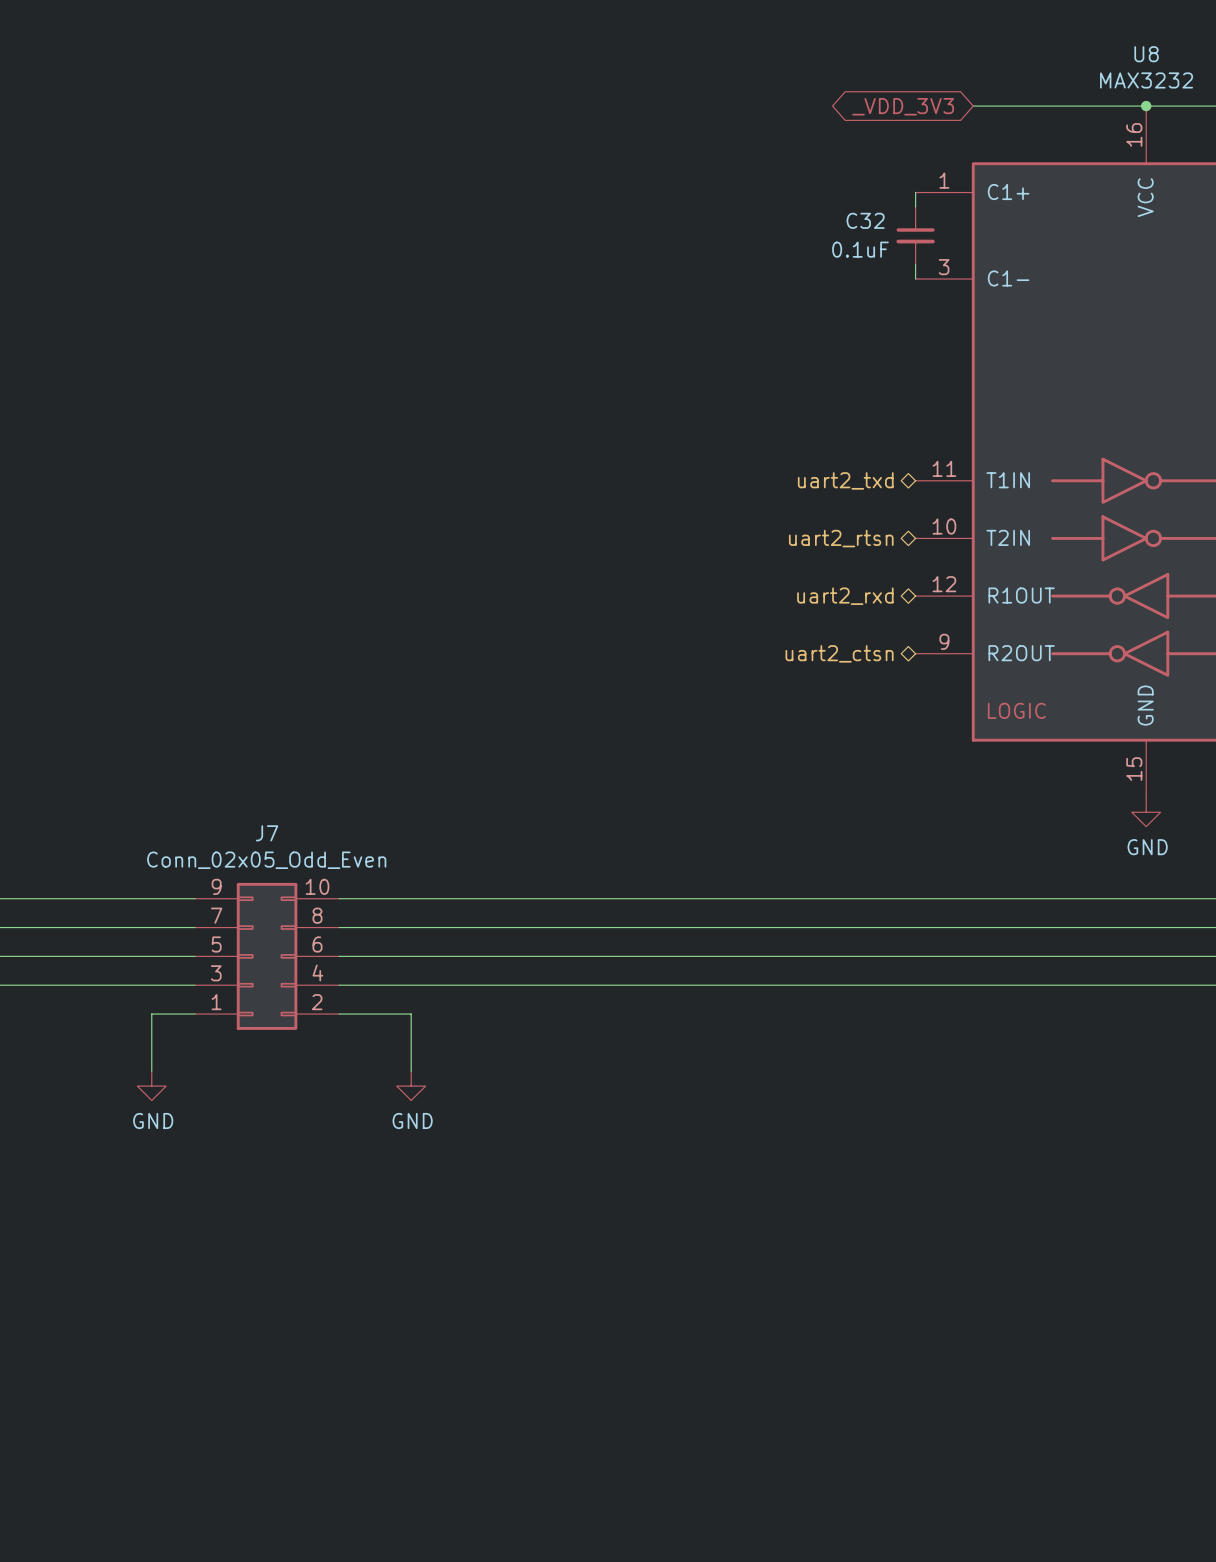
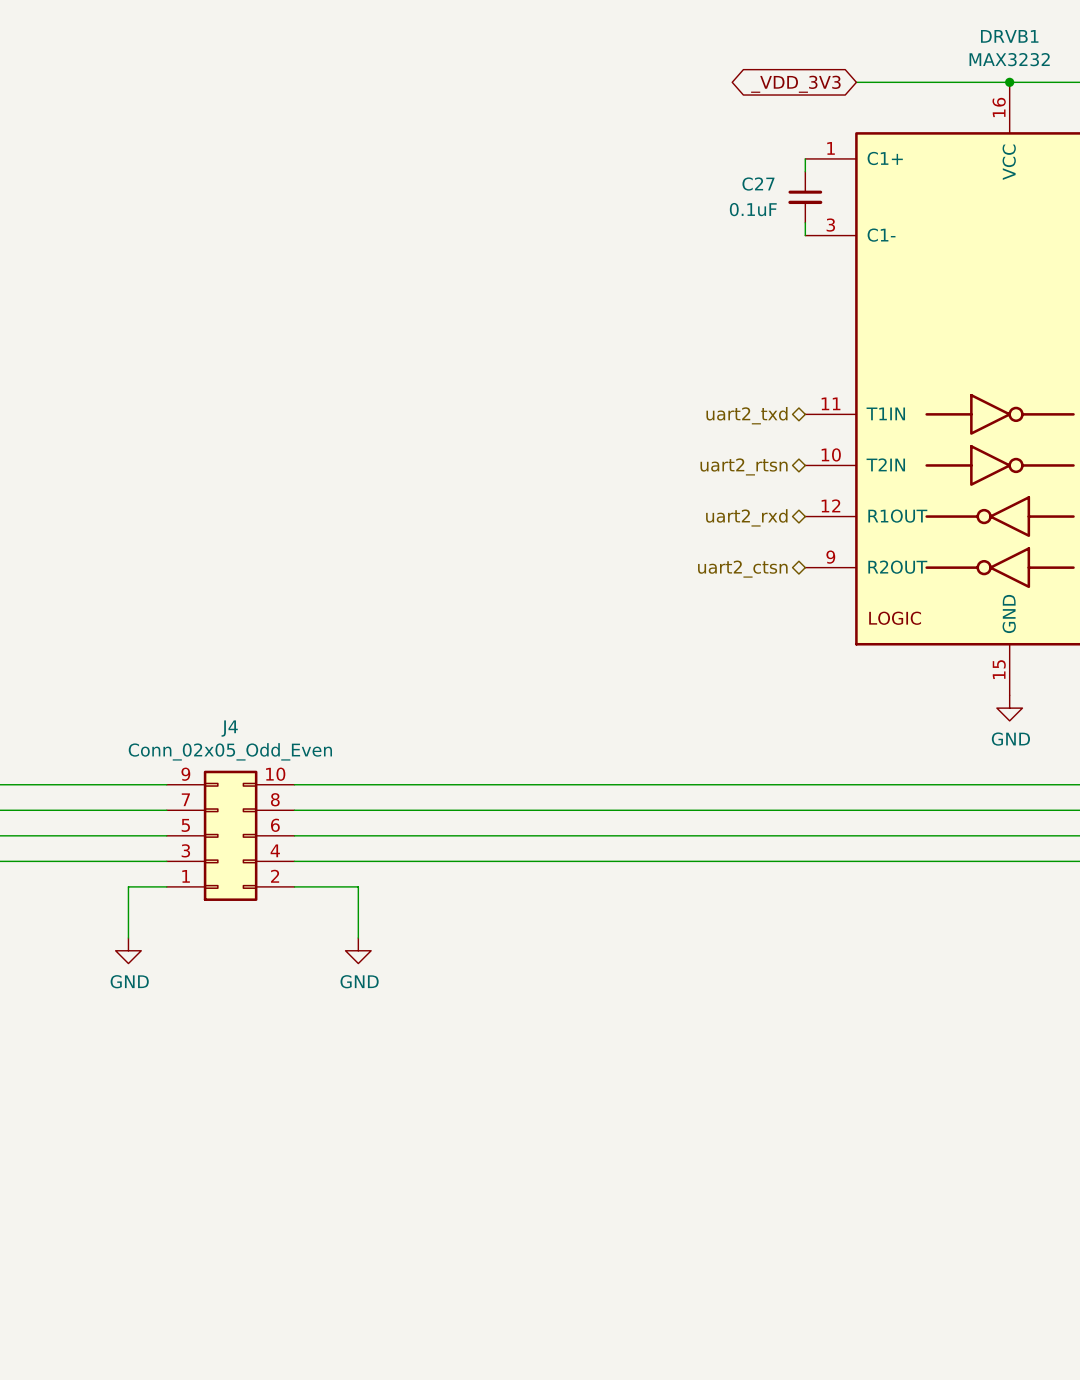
U8 name: U8 (1146, 54) -> DRVB1 (1009, 36)
C32 name: C32 (865, 220) -> C27 (758, 184)
J7 name: J7 (267, 833) -> J4 (229, 728)

